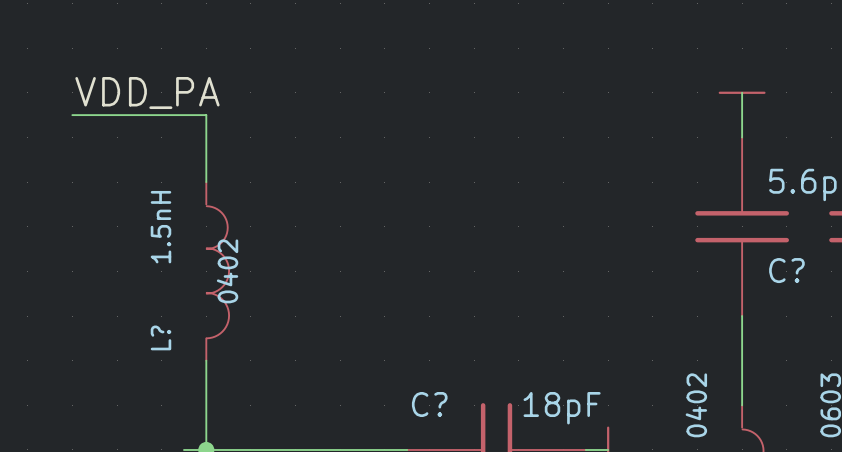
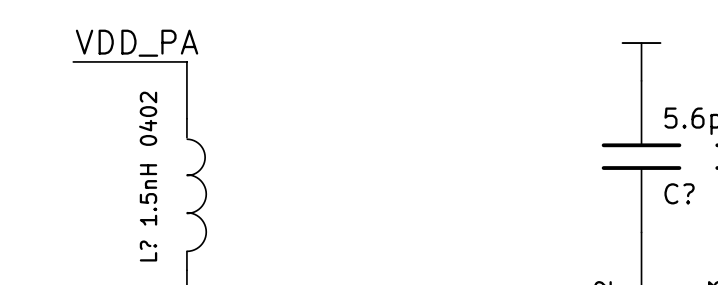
L? value position: 1.5nH (160, 227) -> 1.5nH (148, 194)
L? text position: 0402 (227, 271) -> 0402 (148, 118)

